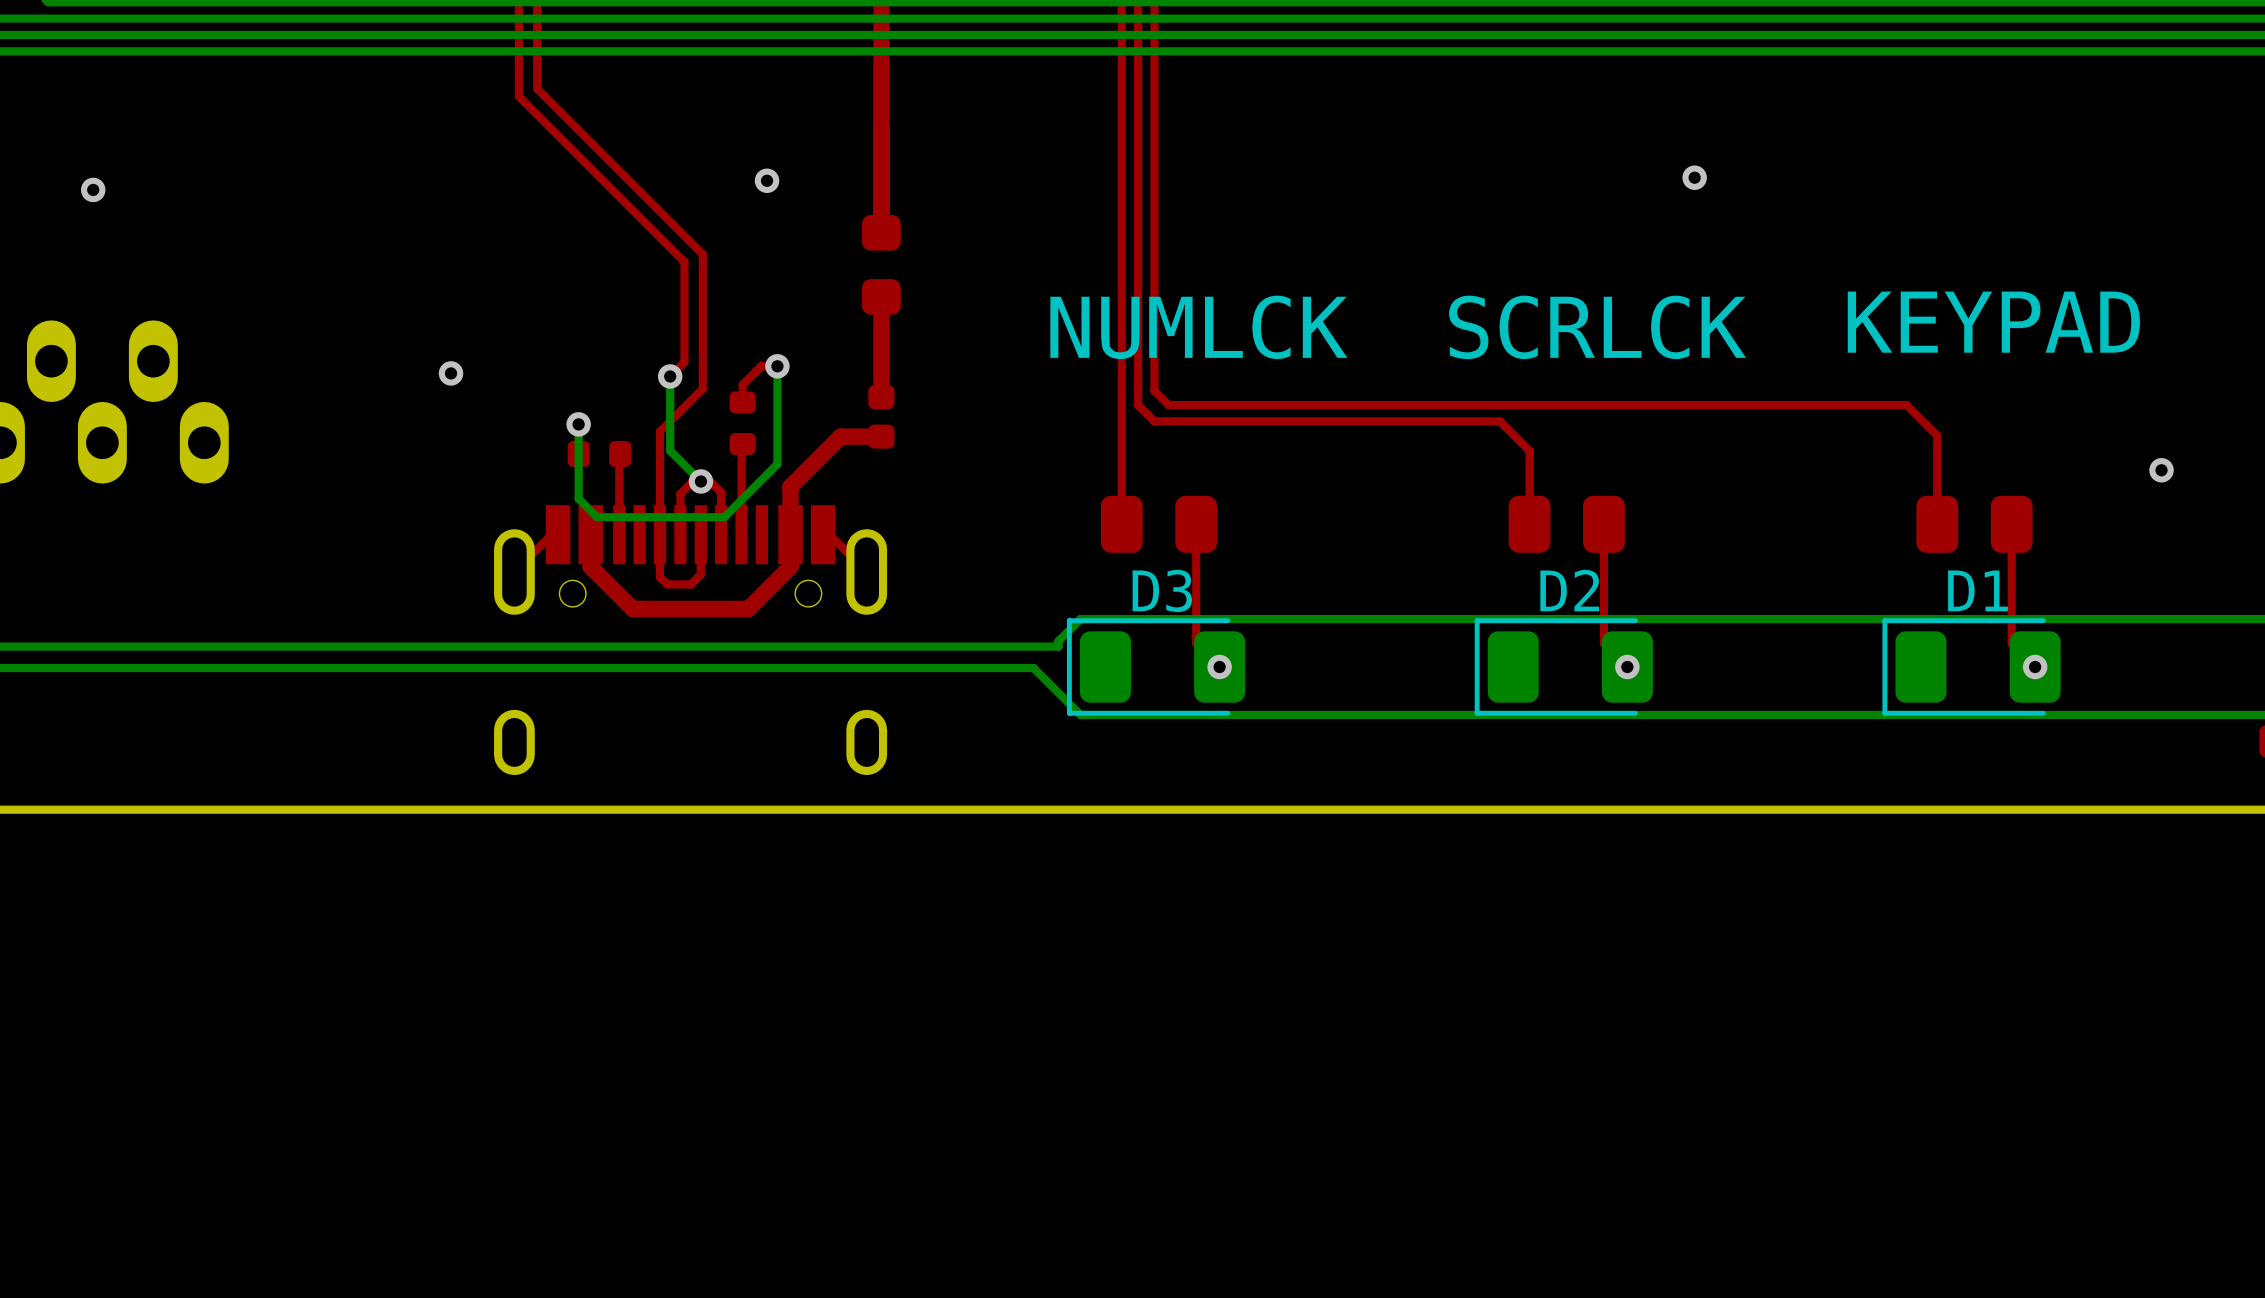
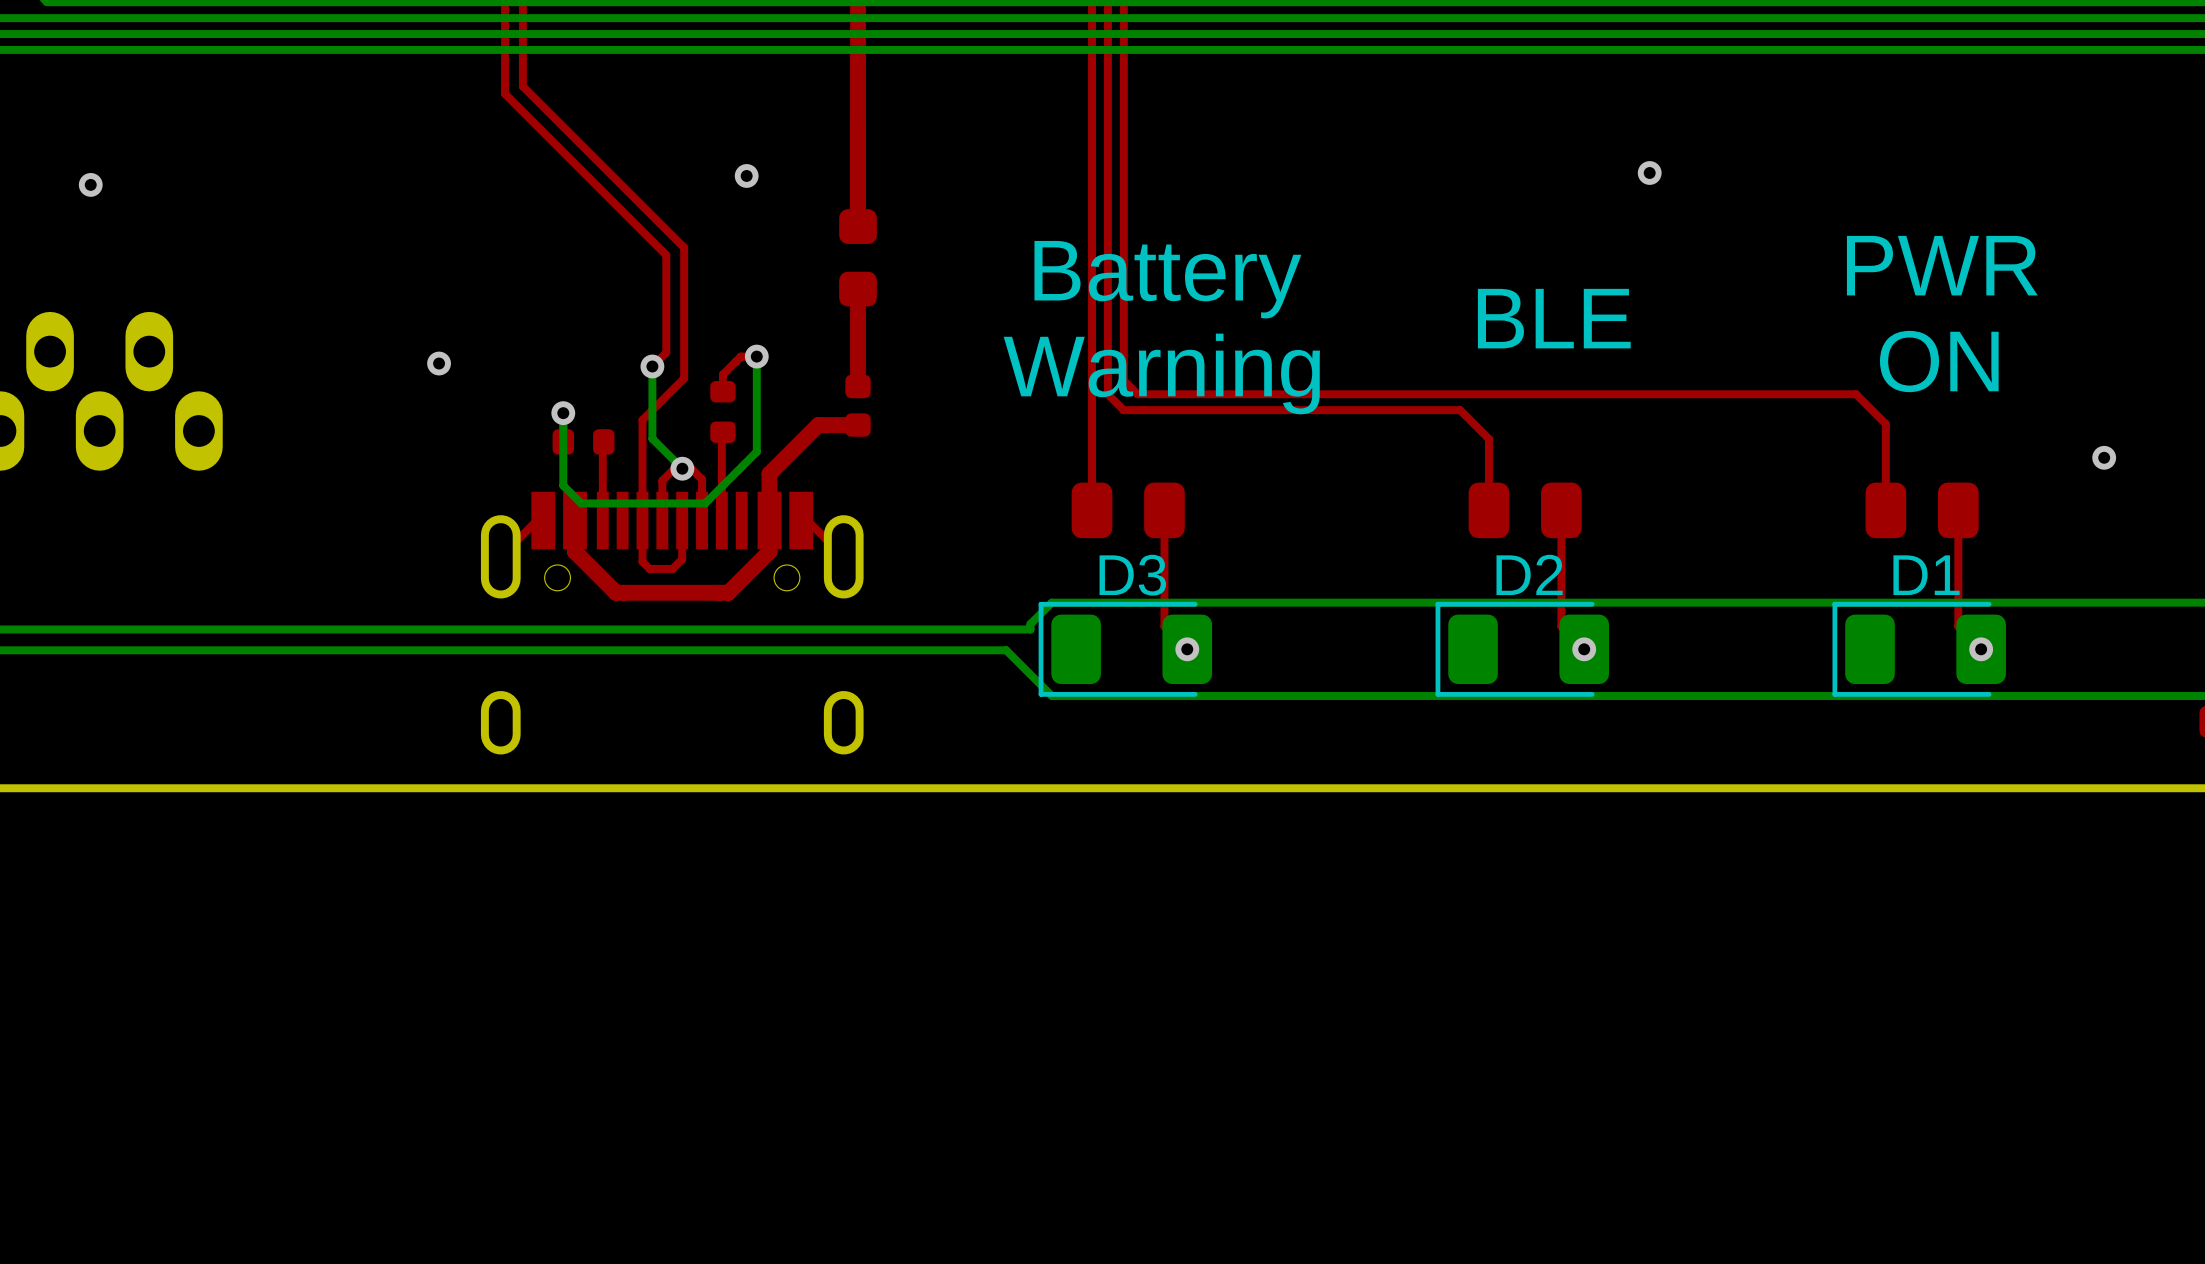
text: none -> PWR (1942, 265)
text: none -> Battery (1167, 279)
text: KEYPAD (1993, 322) -> none
text: NUMLCK (1198, 327) -> none
text: SCRLCK (1597, 327) -> BLE (1554, 318)
text: none -> ON (1939, 361)
text: none -> Warning (1161, 373)

